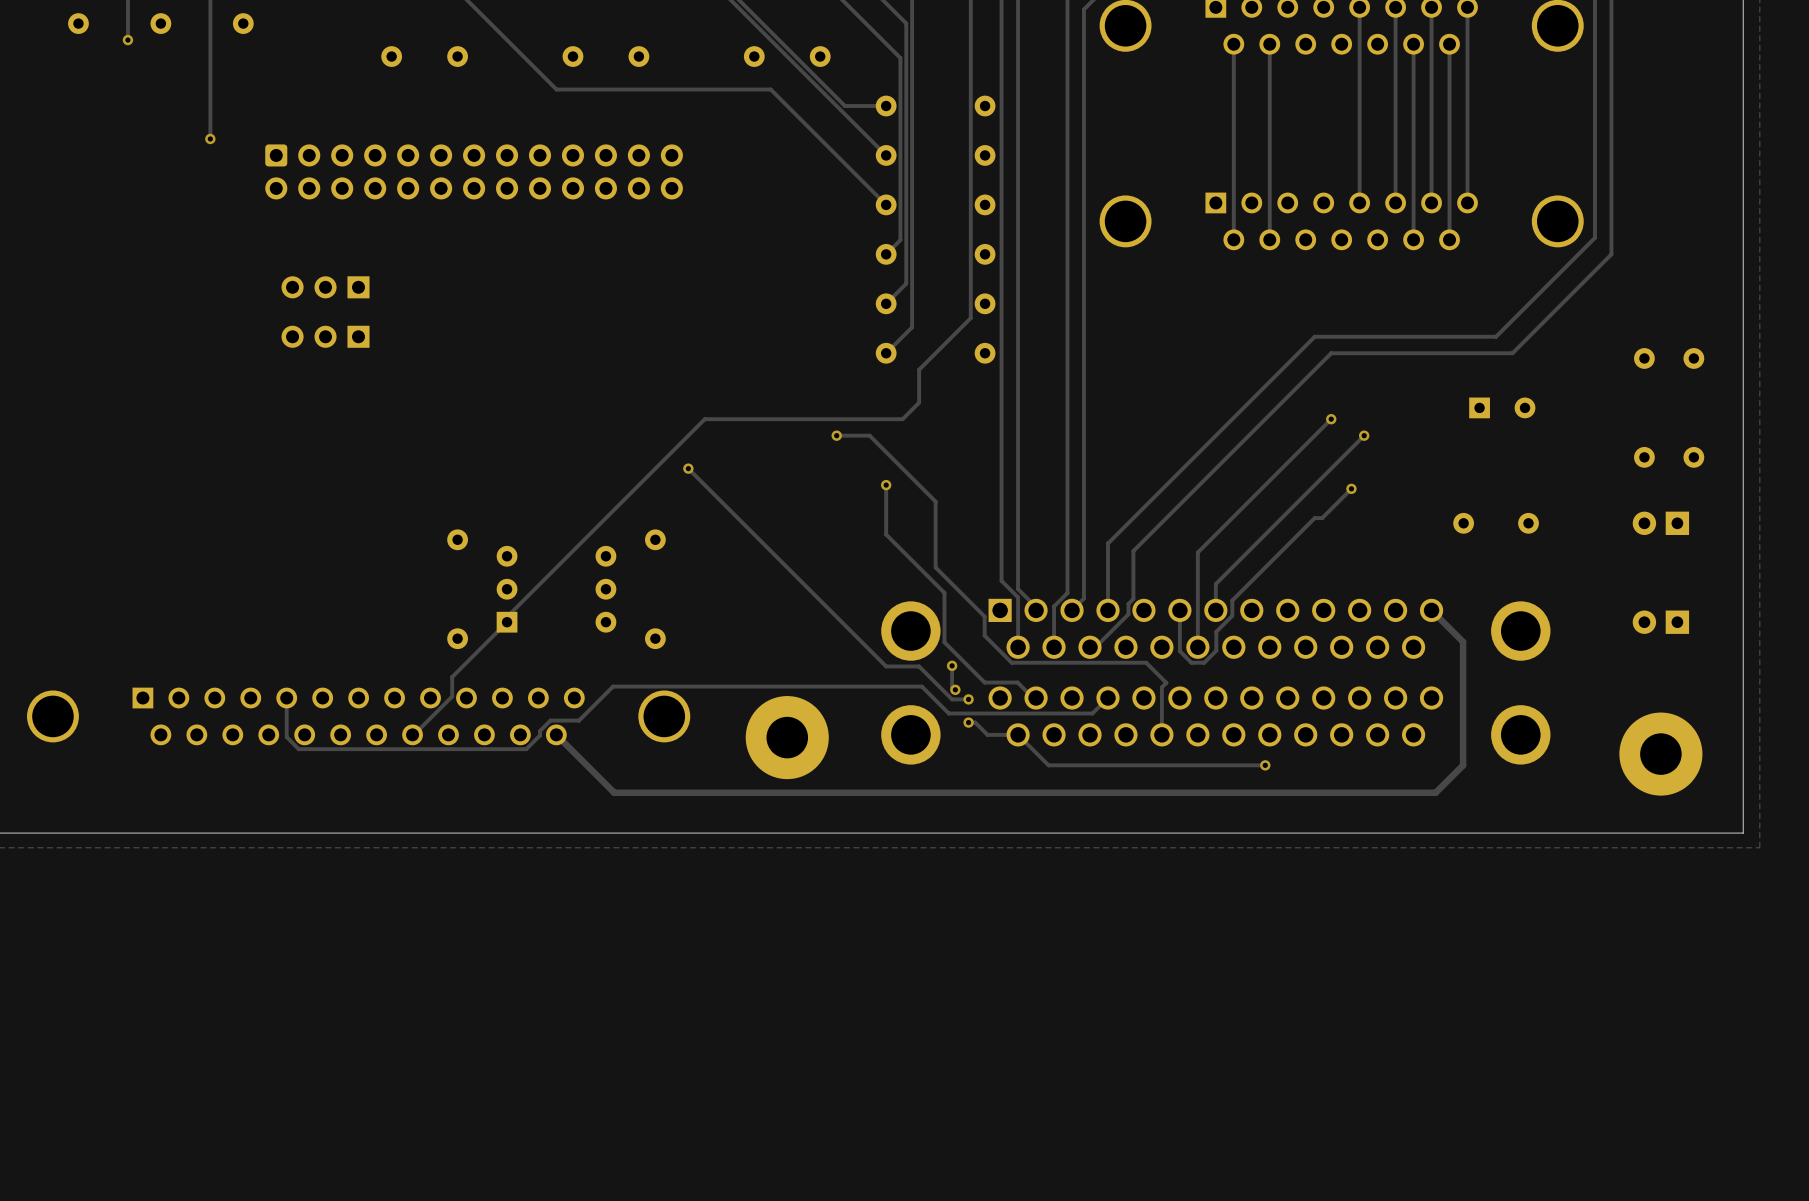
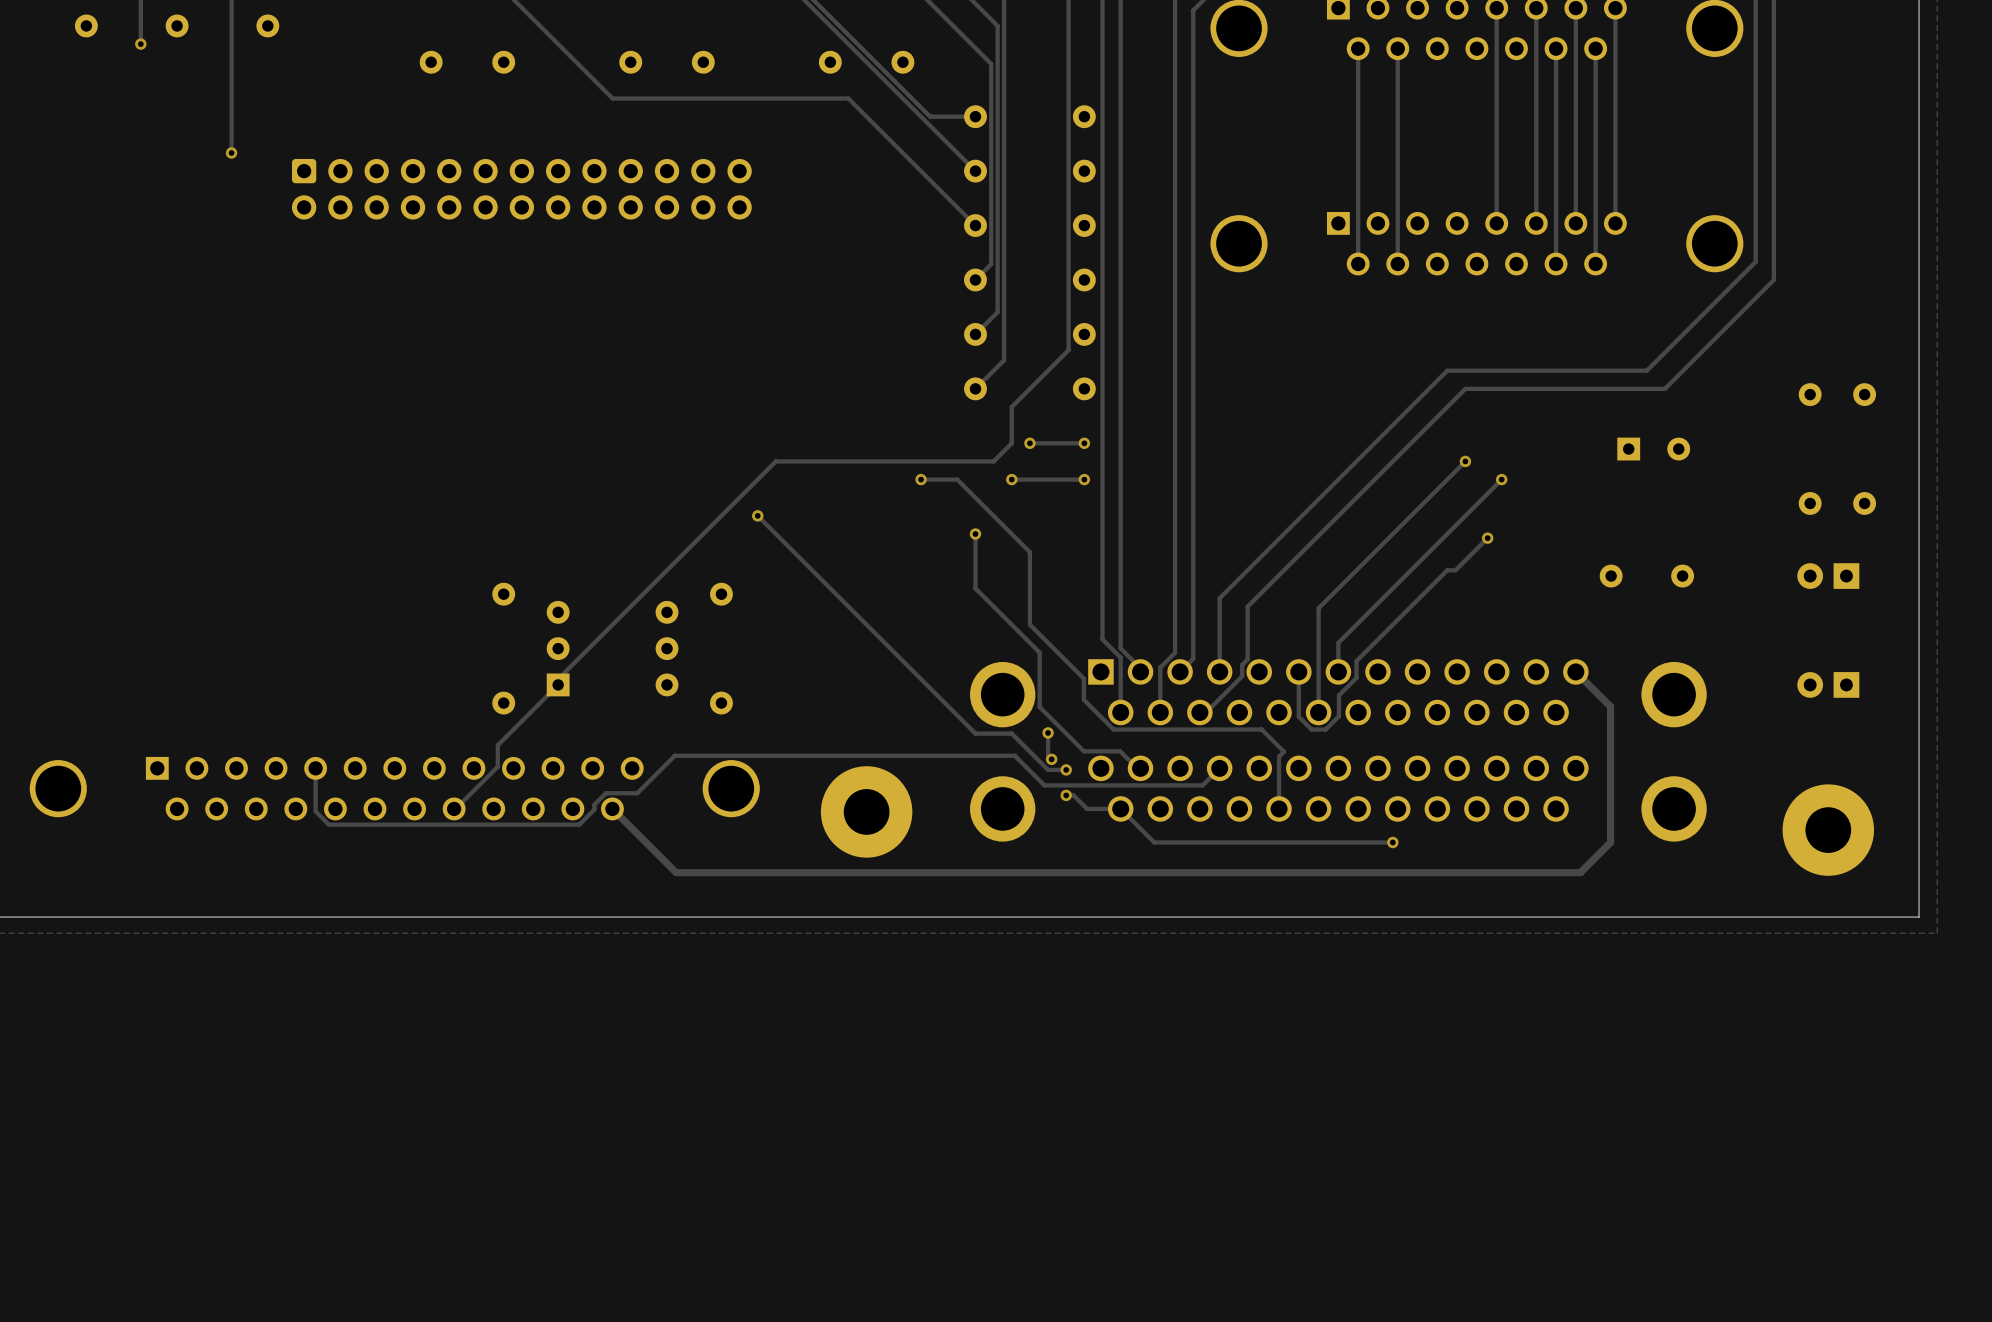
part: (325, 287) -> none
part: (325, 336) -> none
via: none -> (1029, 443)
track: none -> (1084, 443) (1029, 443)
via: none -> (1084, 443)
via: none -> (1011, 479)
track: none -> (1084, 479) (1011, 479)
via: none -> (1084, 479)

